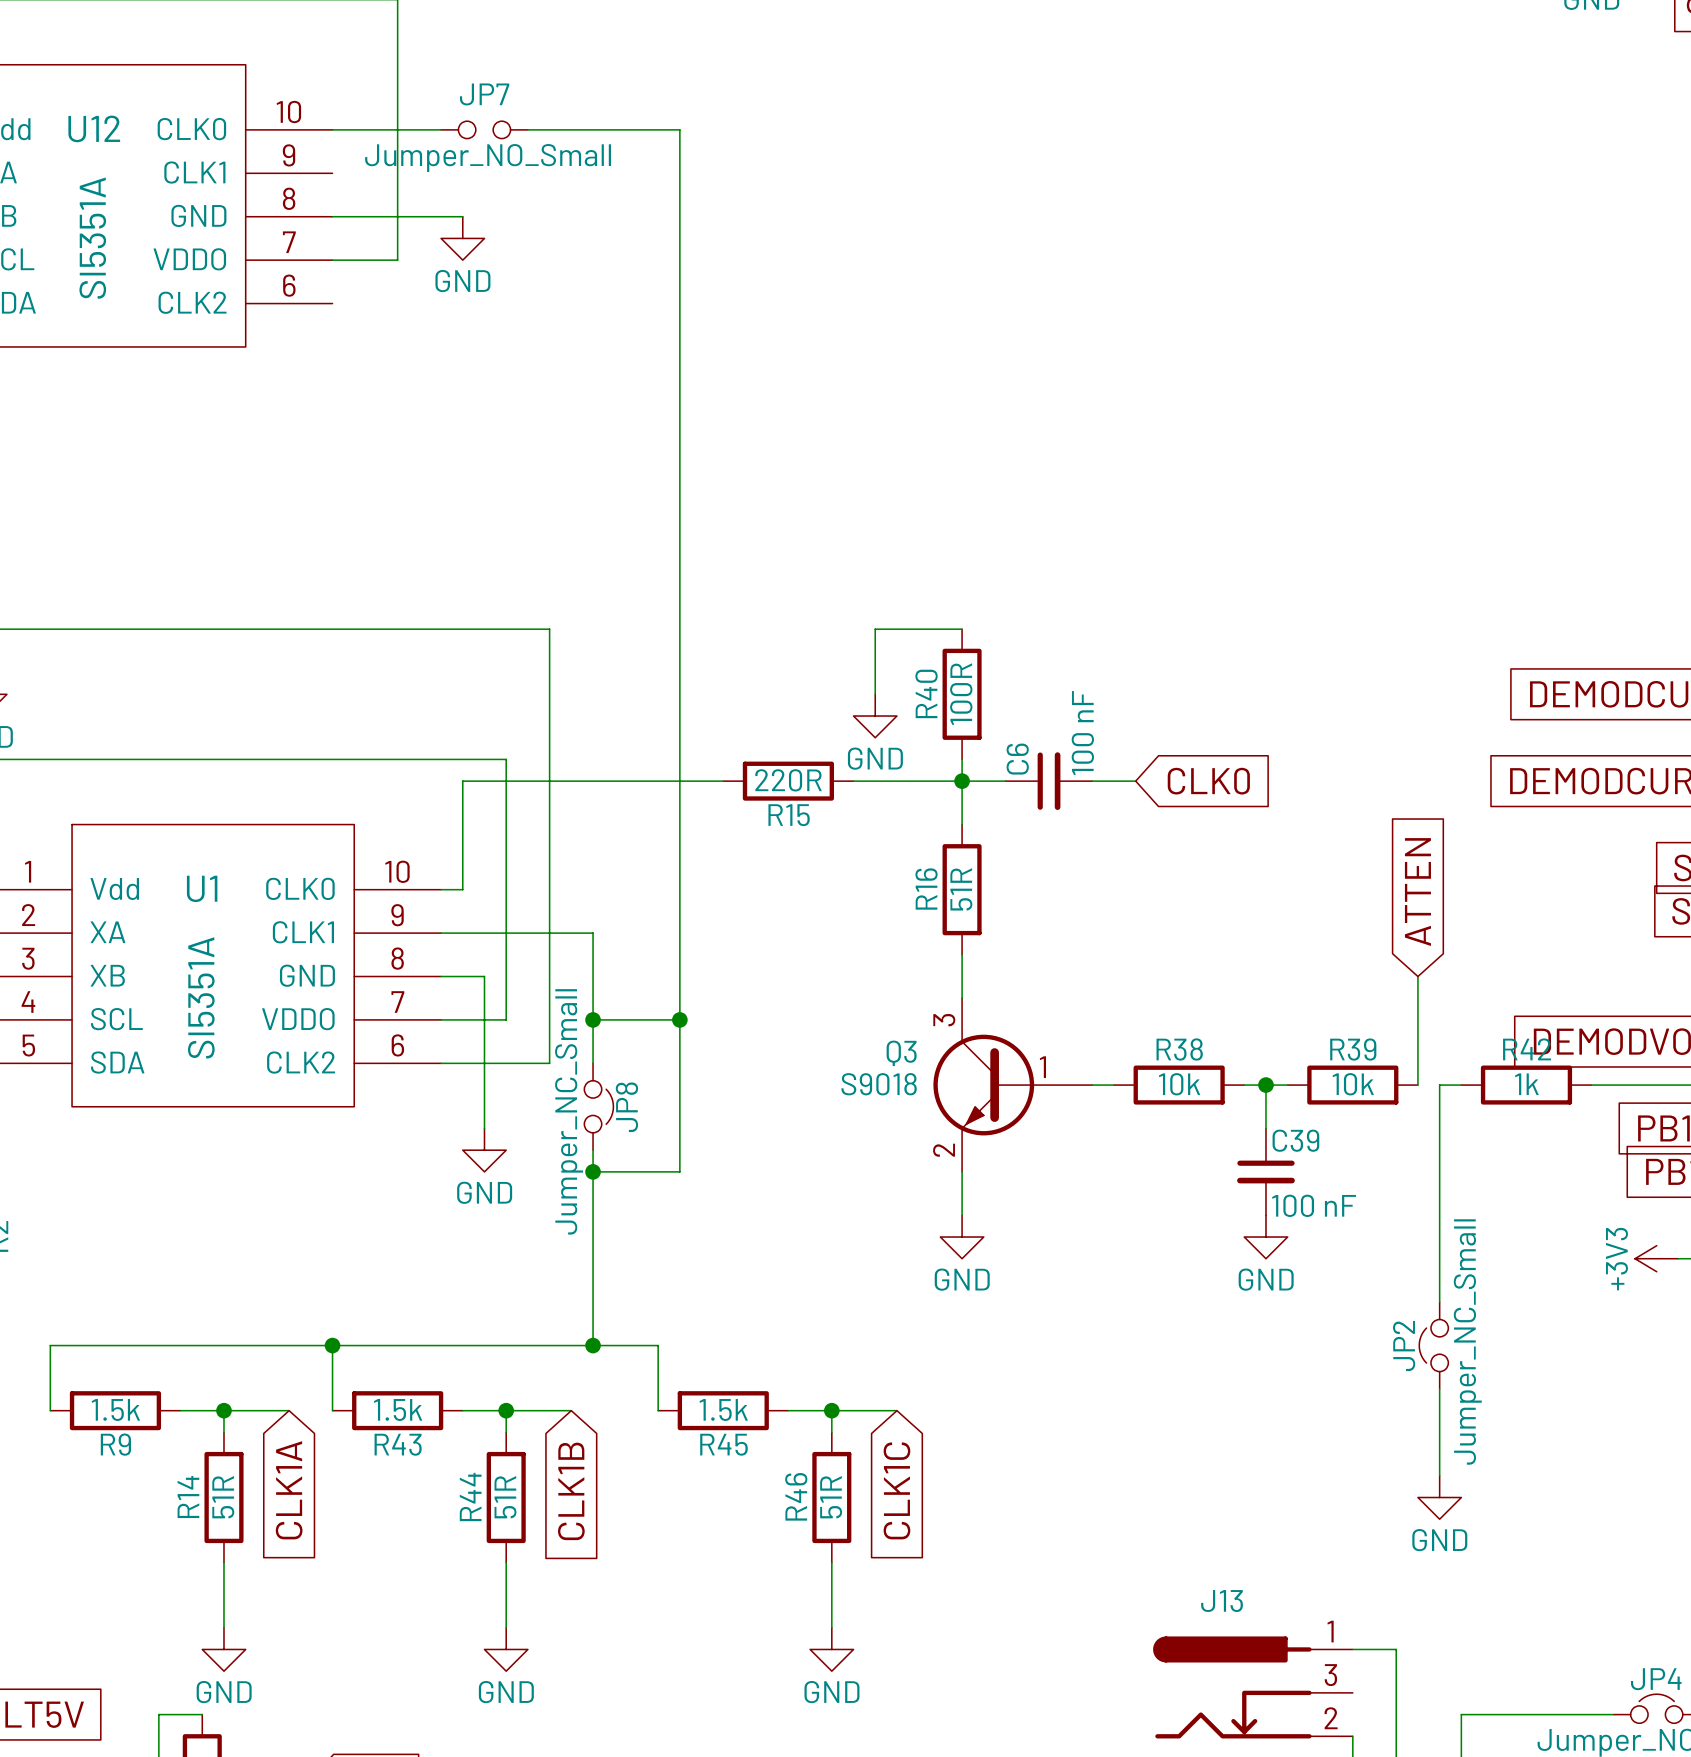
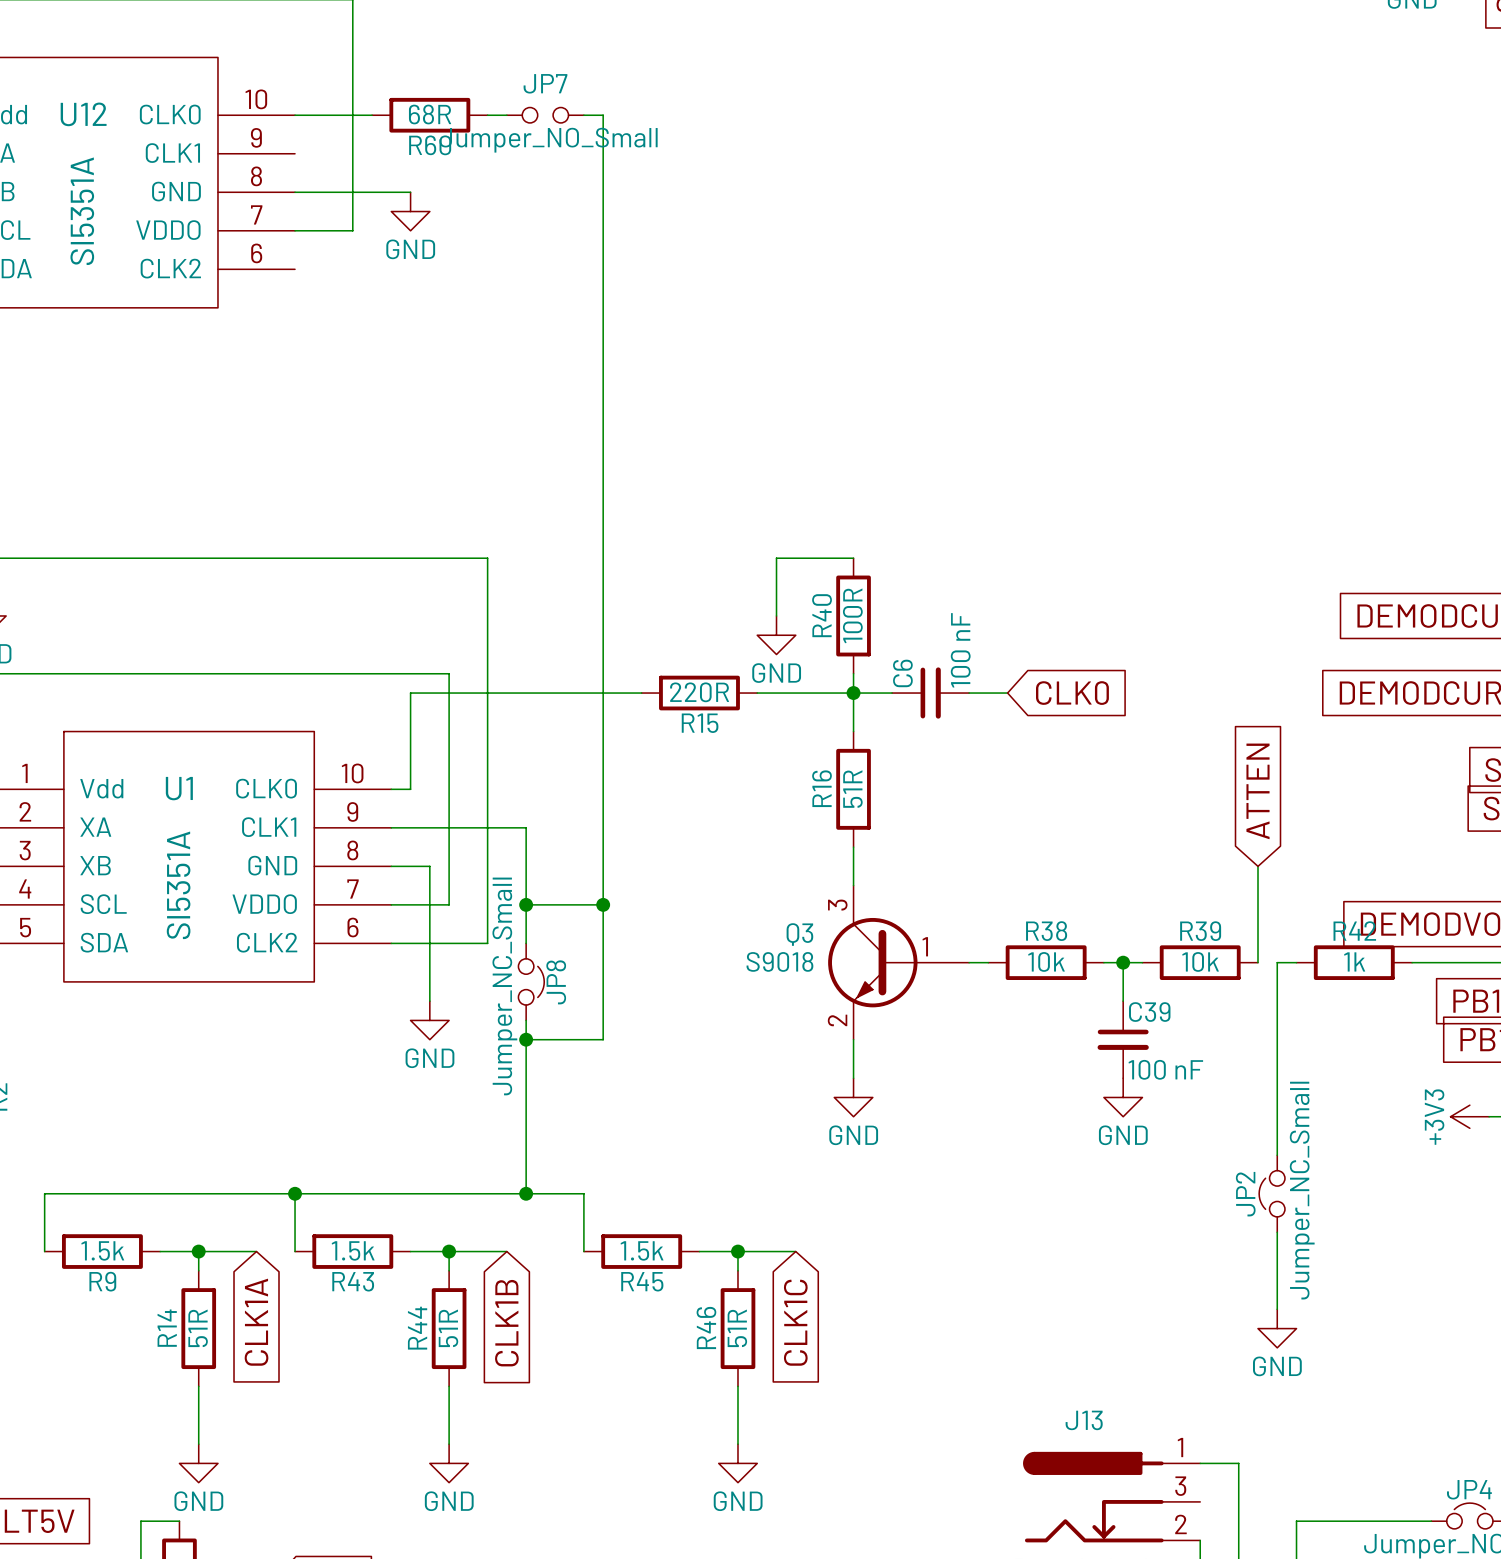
JP7 position: (484, 129) -> (545, 115)
R60: none -> 68R (429, 115)
wire: (571, 129) (658, 129) -> none

